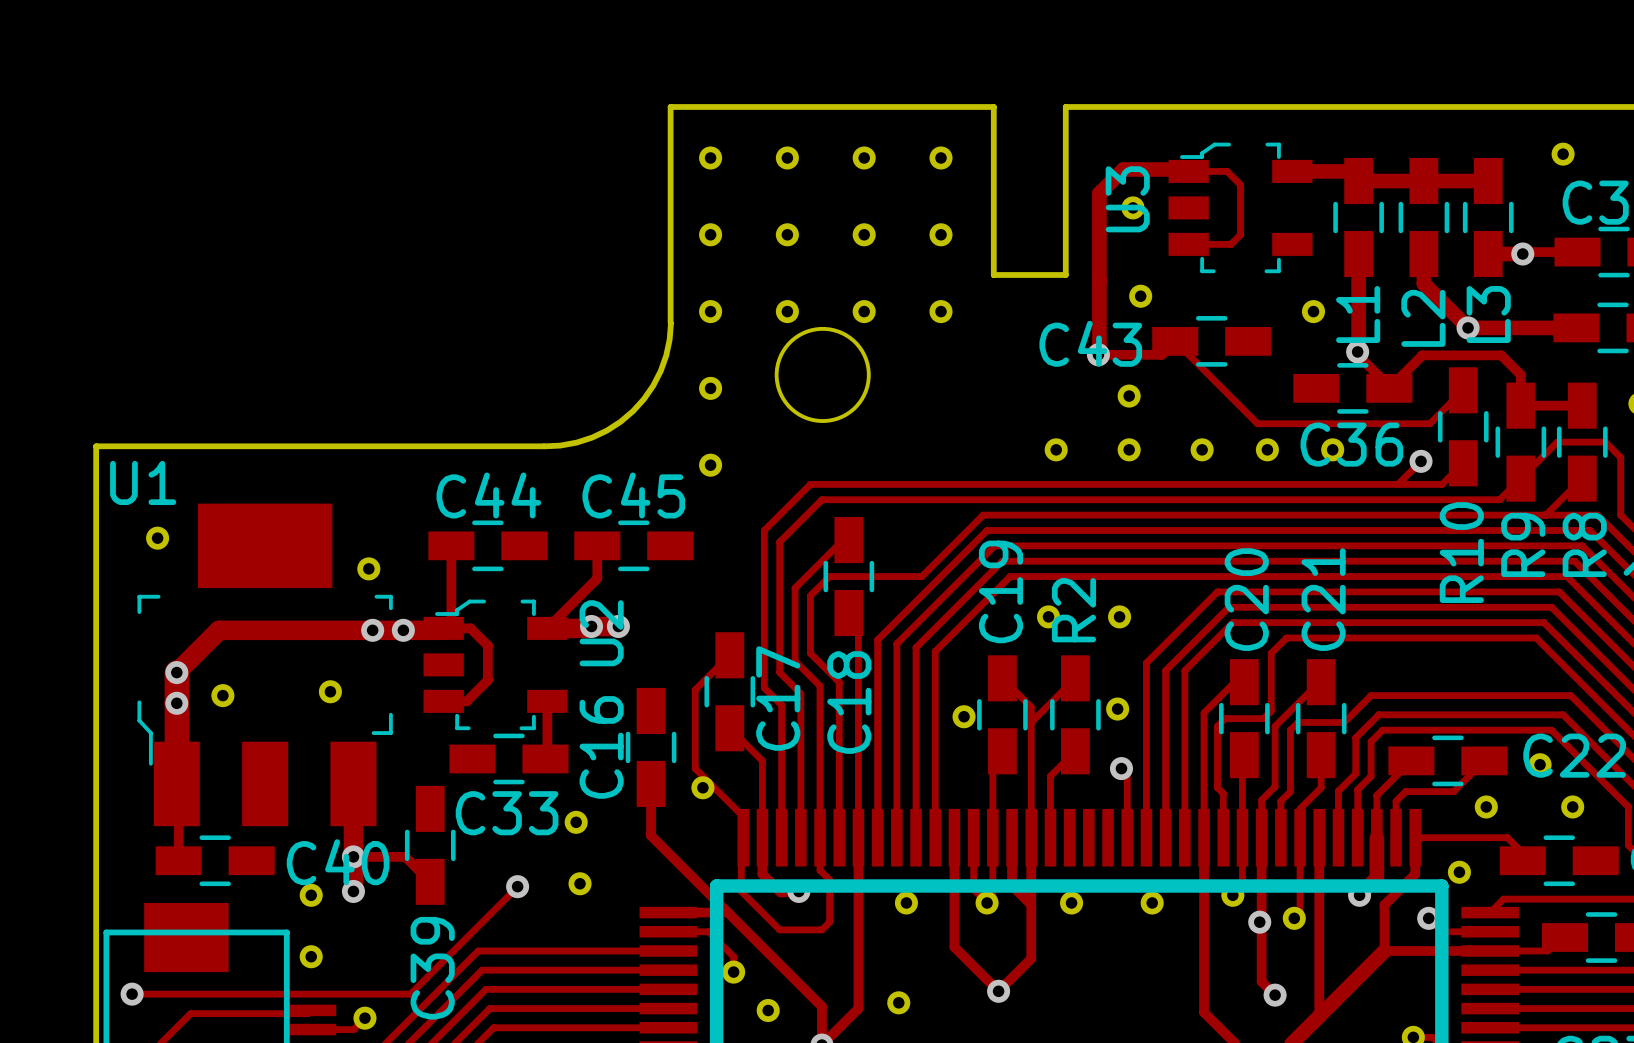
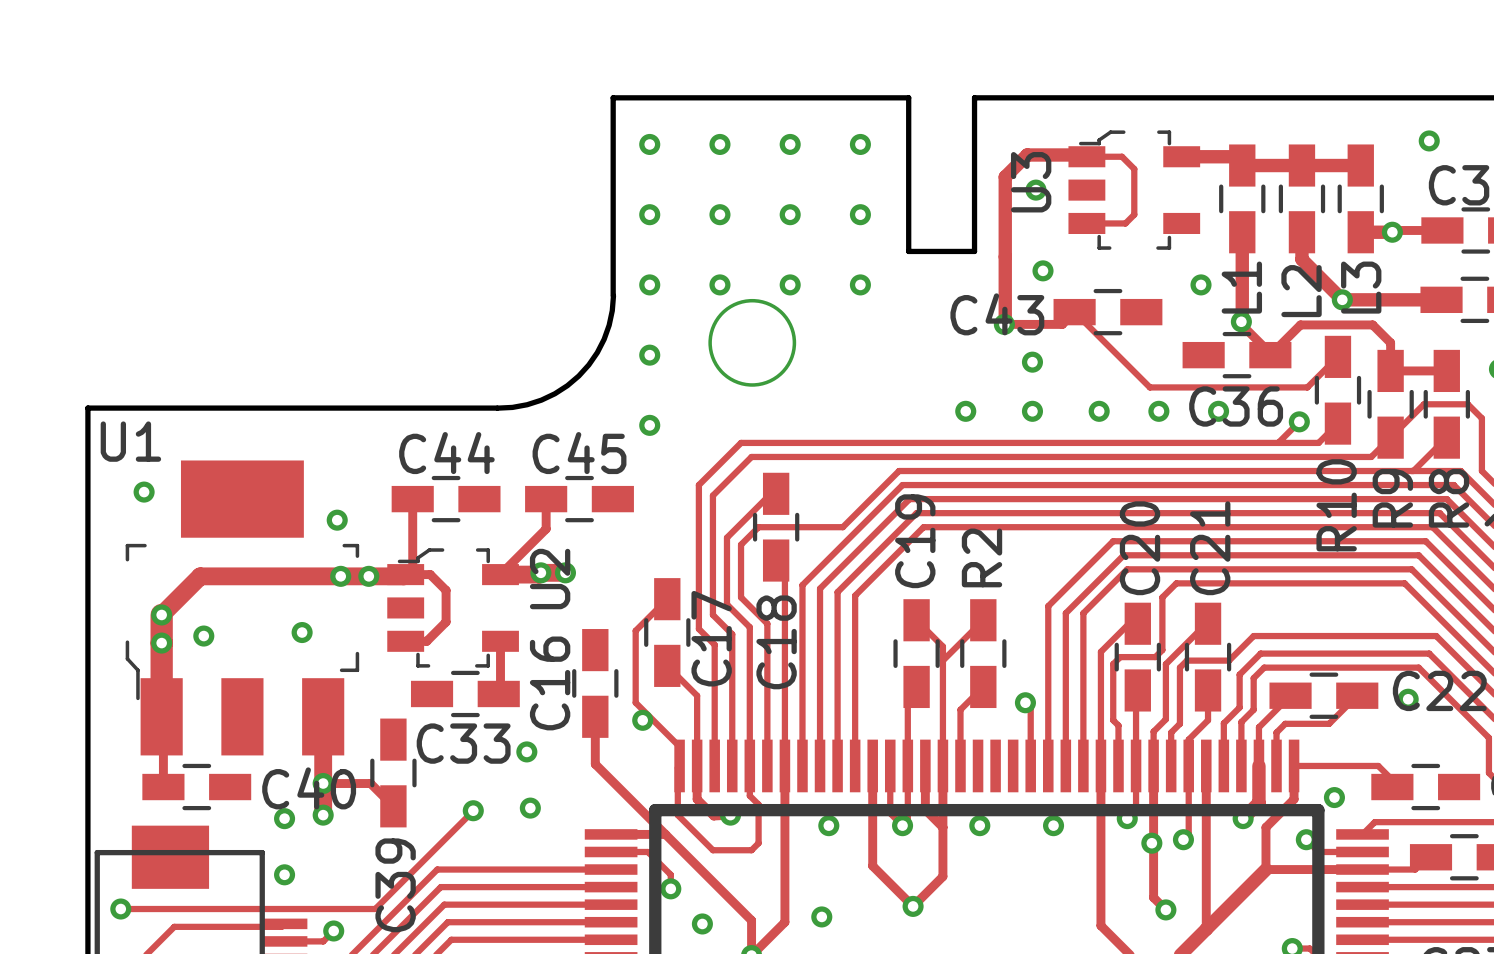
part: (1048, 616) -> none
part: (1119, 616) -> none
part: (1117, 709) -> none
part: (964, 716) -> none
part: (1486, 806) -> none
part: (1572, 806) -> none

